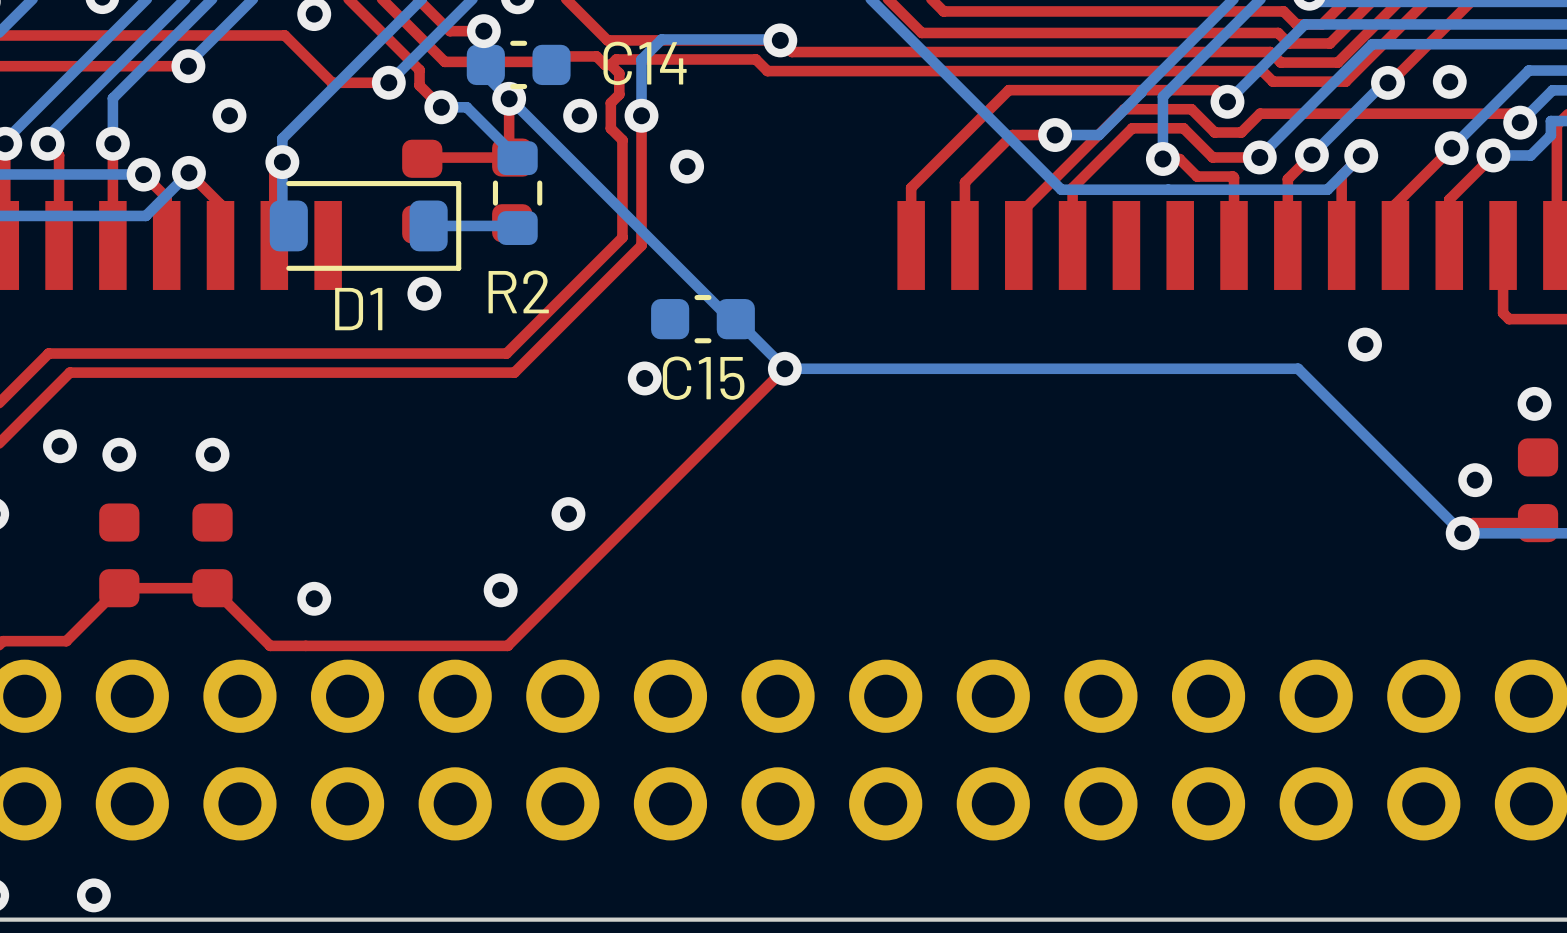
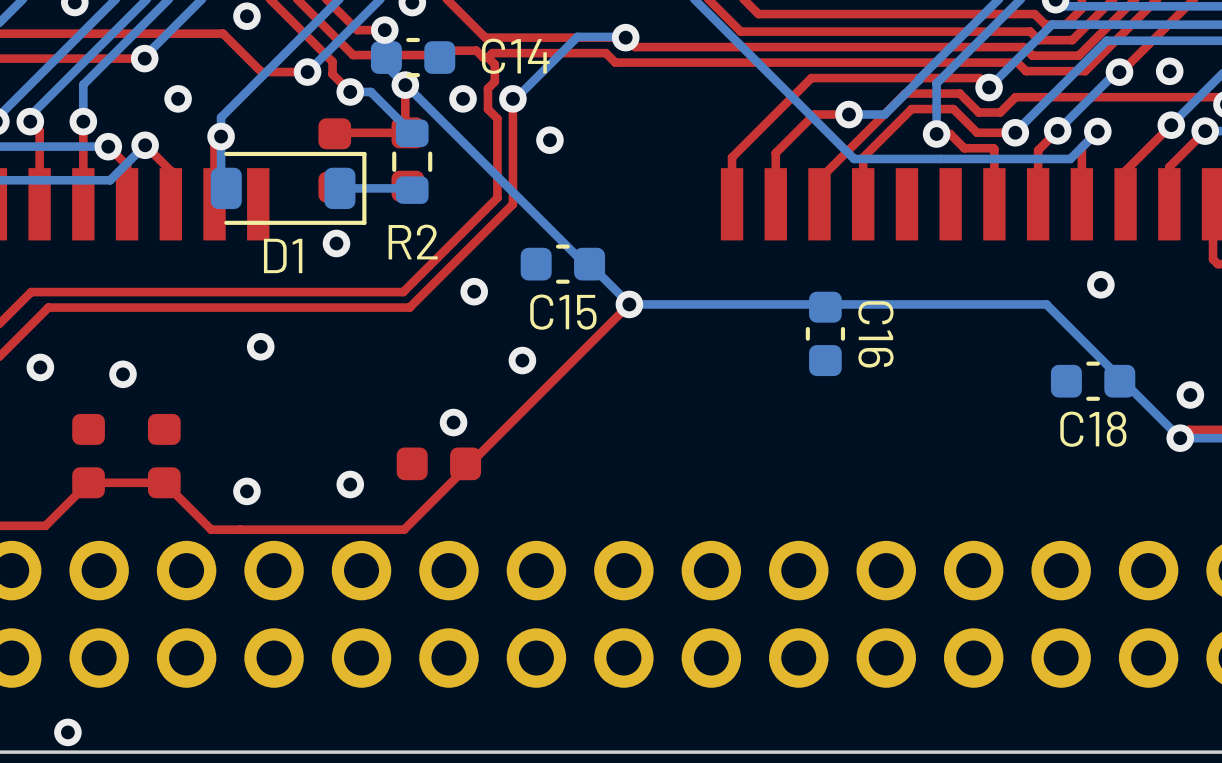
bottom track: (720, 39) (661, 39) (641, 59) (641, 115) -> (577, 36) (515, 98) (512, 98)
via: none -> (474, 291)
via: (644, 378) -> none
C16: none -> (825, 333)
via: none -> (260, 346)
via: none -> (522, 360)
via: (119, 454) -> none
via: none -> (123, 374)
via: (212, 454) -> none
C18: none -> (1093, 381)
part: none -> (438, 463)
via position: (500, 590) -> (350, 484)

